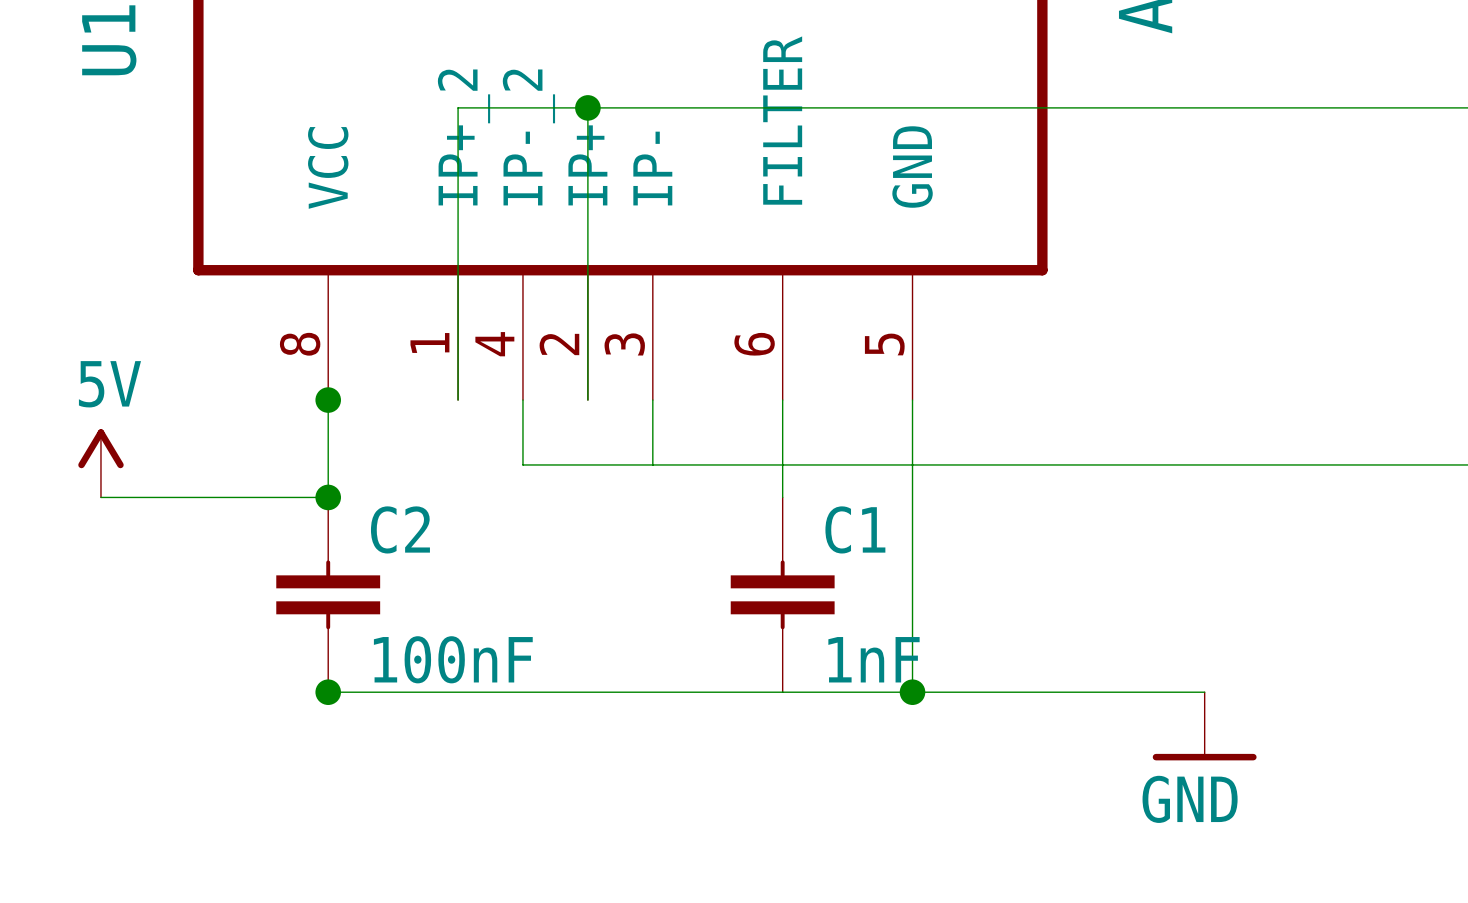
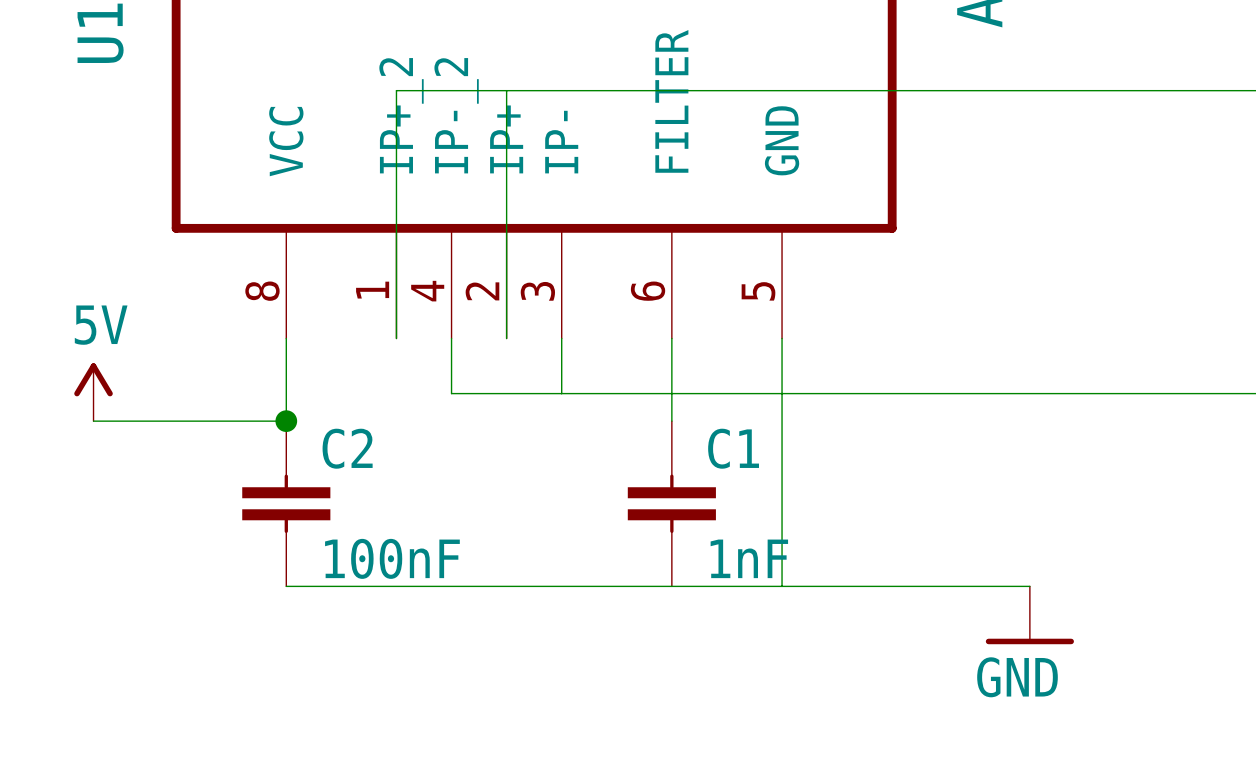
junction: (587, 107) -> none
junction: (328, 400) -> none
junction: (328, 692) -> none
junction: (912, 692) -> none

